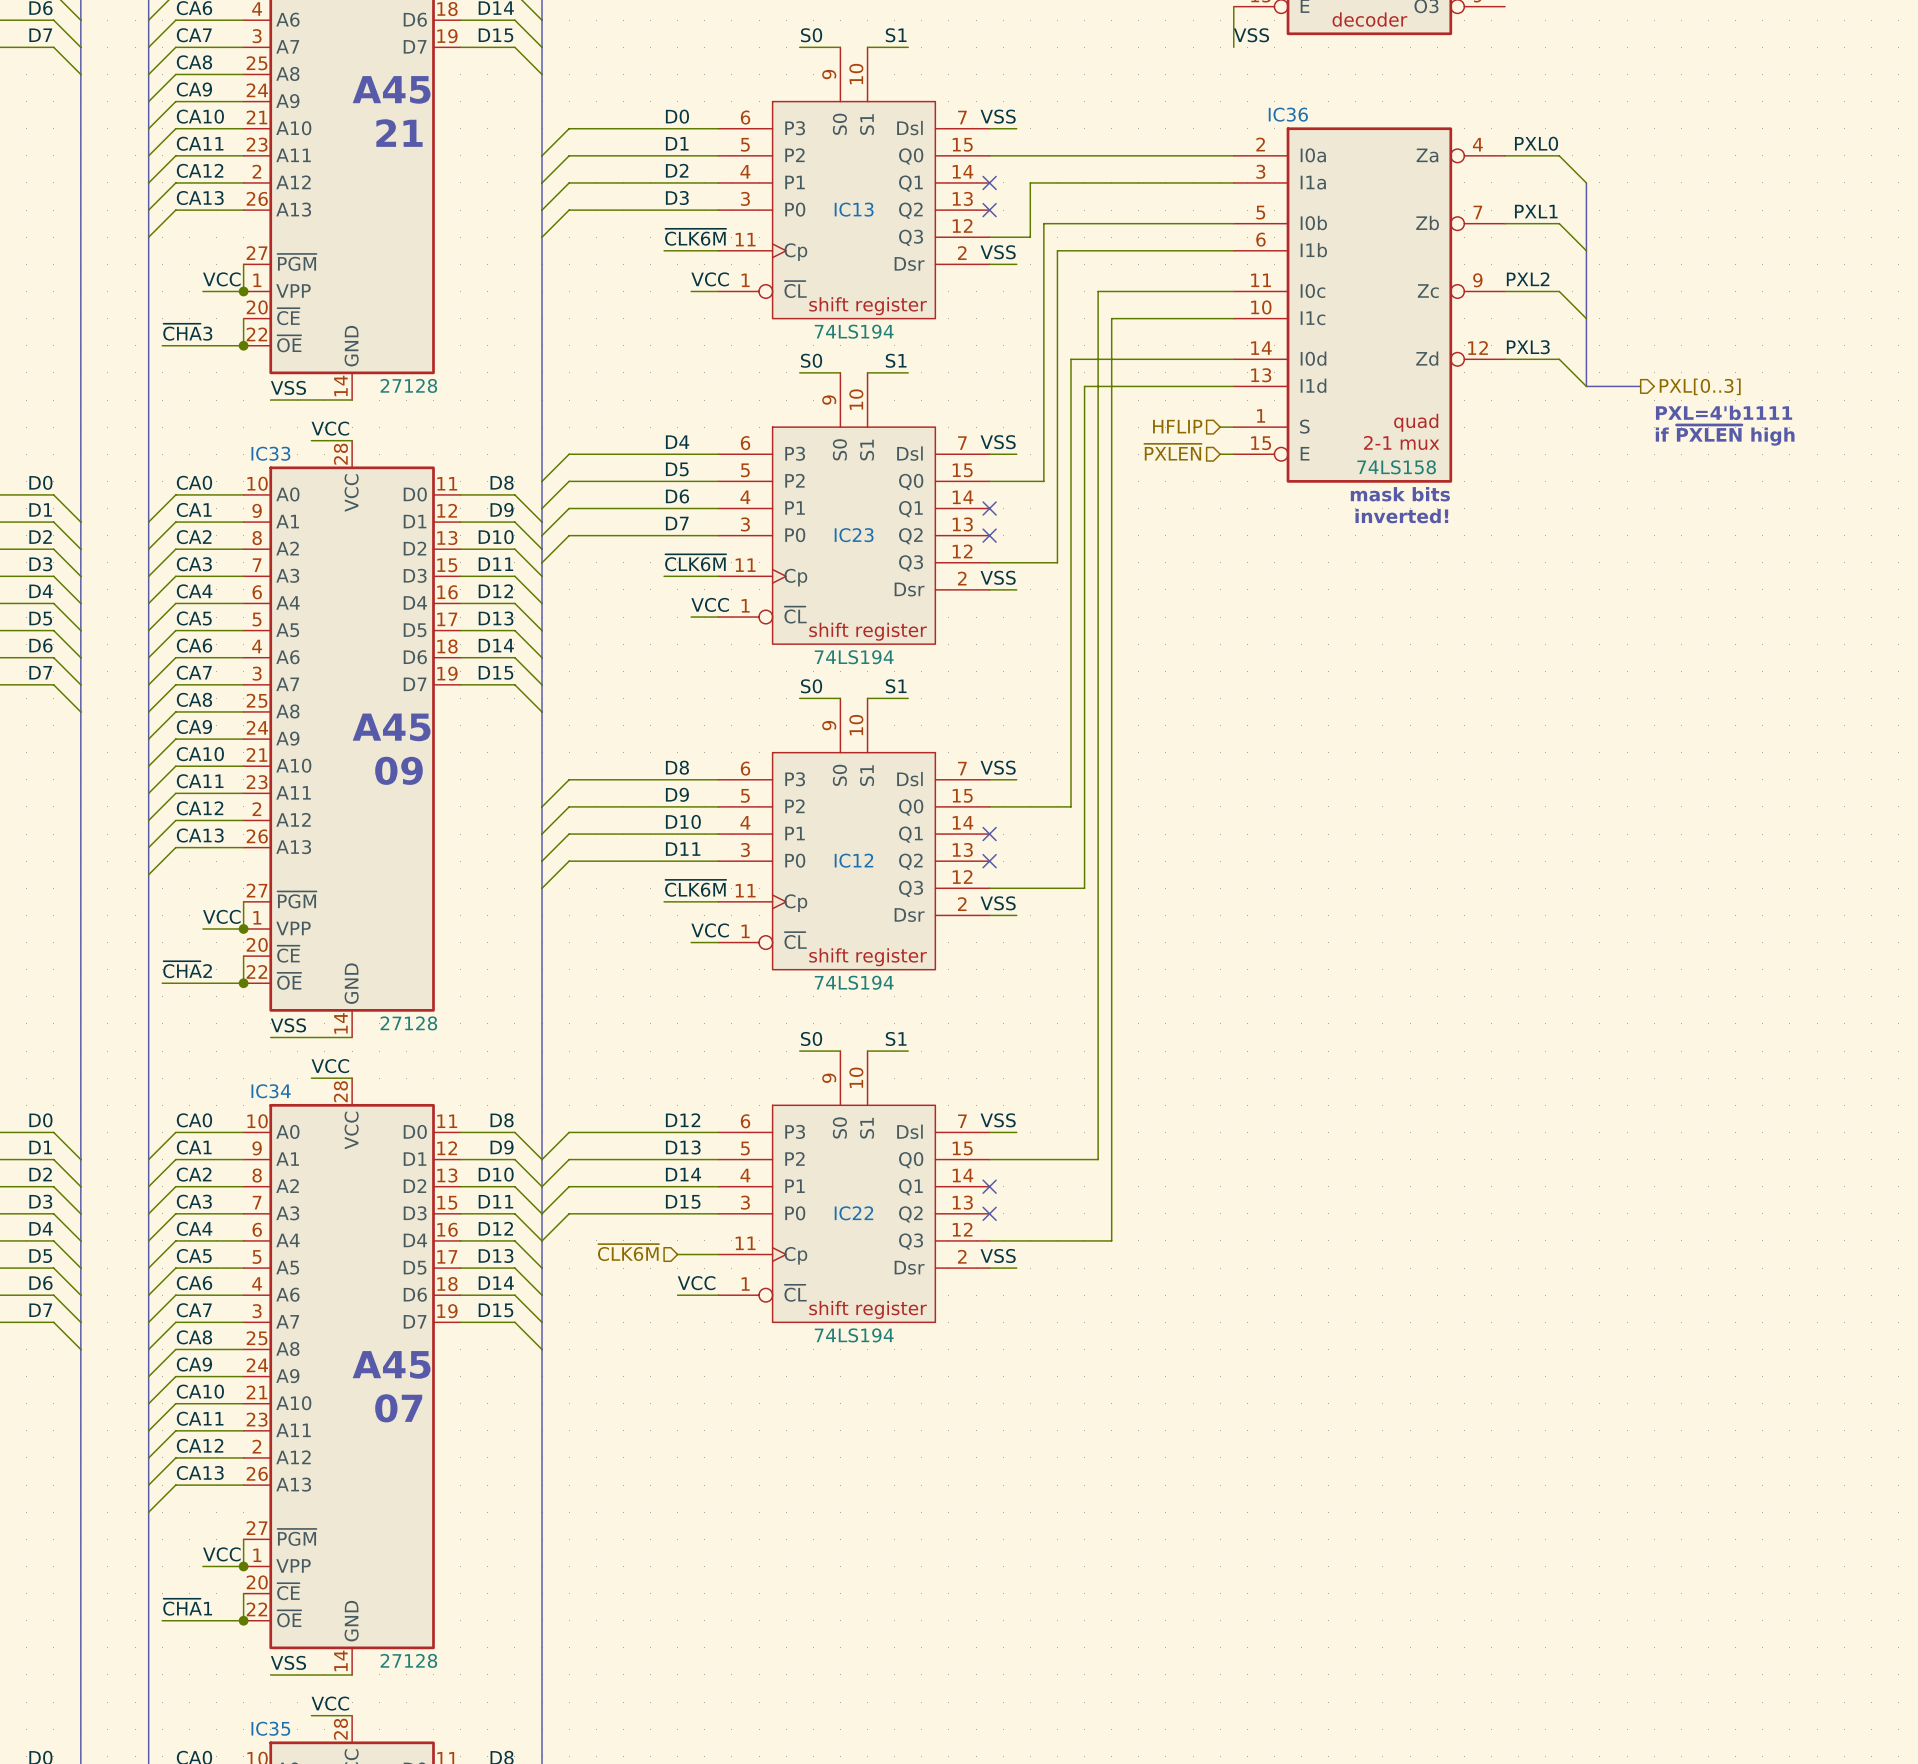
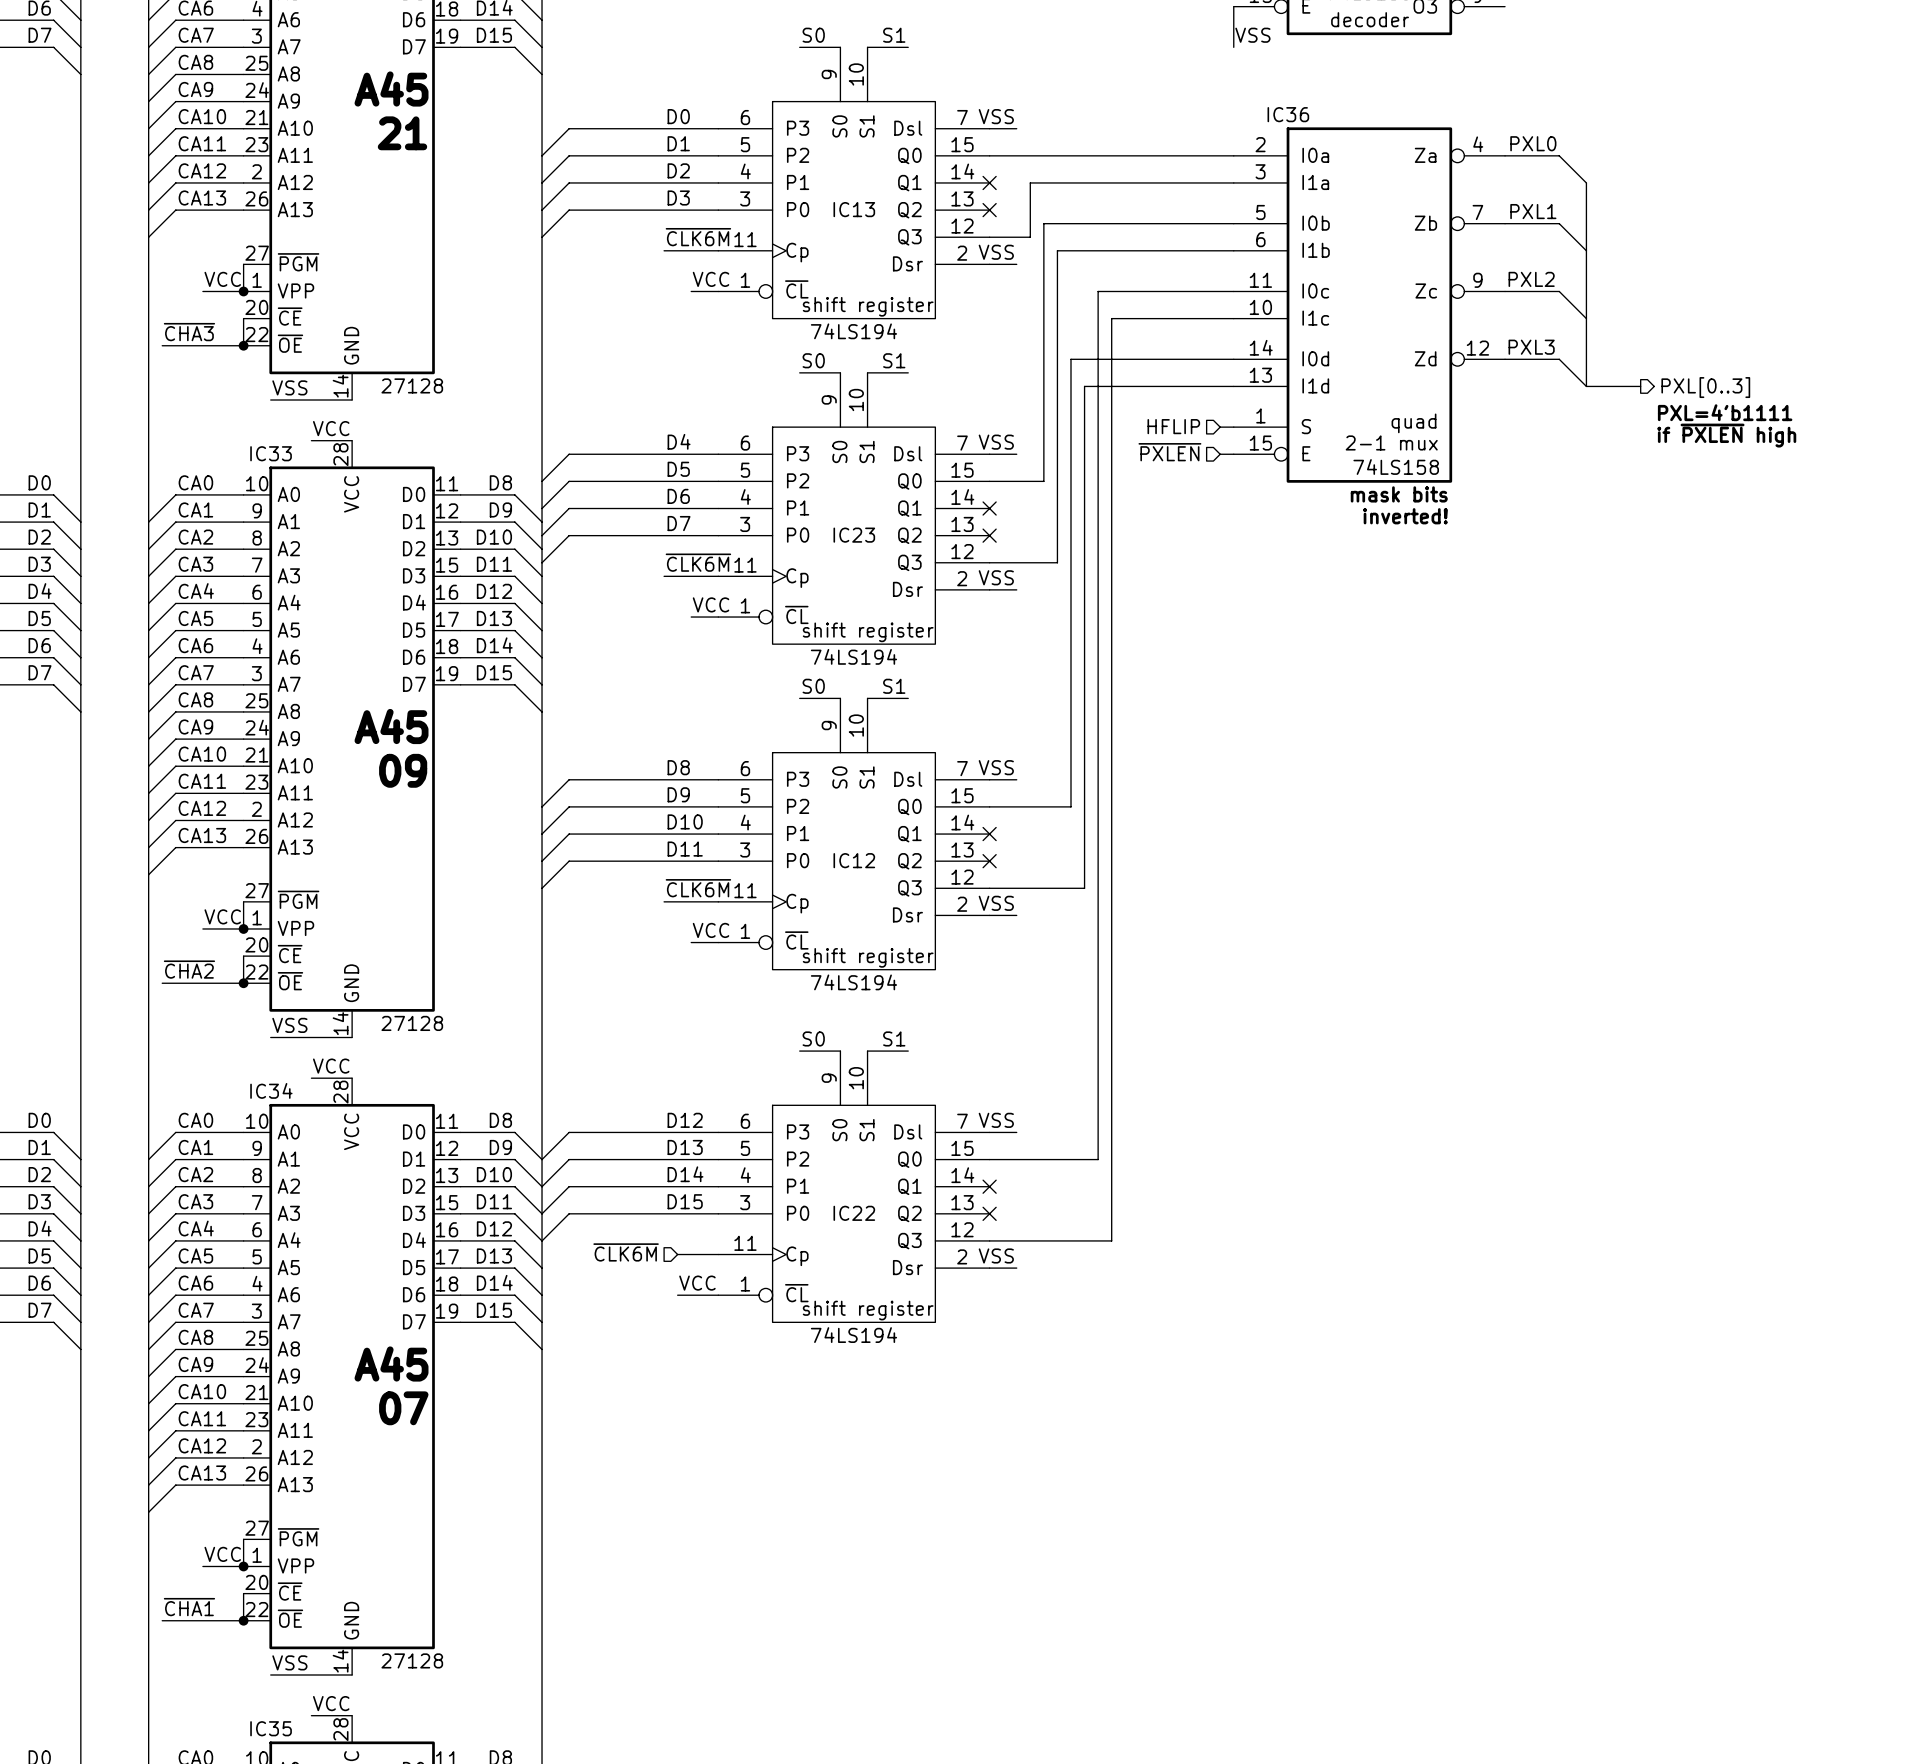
label: ~{CHA}3 (187, 332) -> ~{CHA3} (189, 332)
label: ~{CHA}2 (187, 969) -> ~{CHA2} (189, 969)
label: ~{CHA}1 (187, 1607) -> ~{CHA1} (189, 1607)

